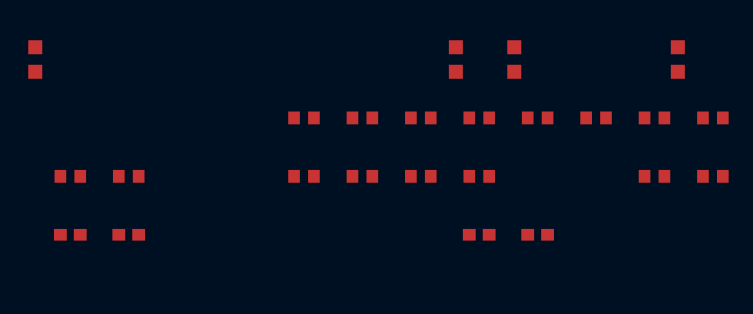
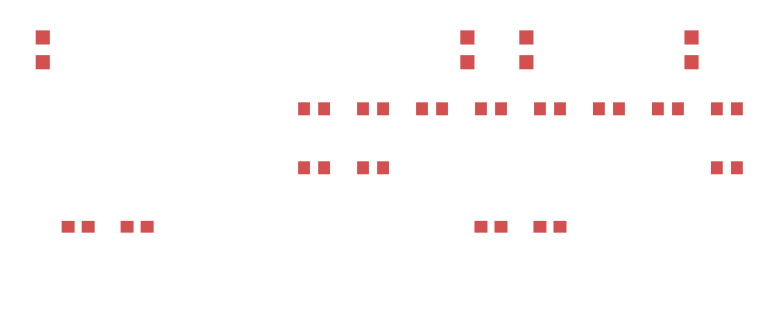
part: (70, 176) -> none
part: (128, 176) -> none
part: (420, 176) -> none
part: (479, 176) -> none
part: (654, 176) -> none

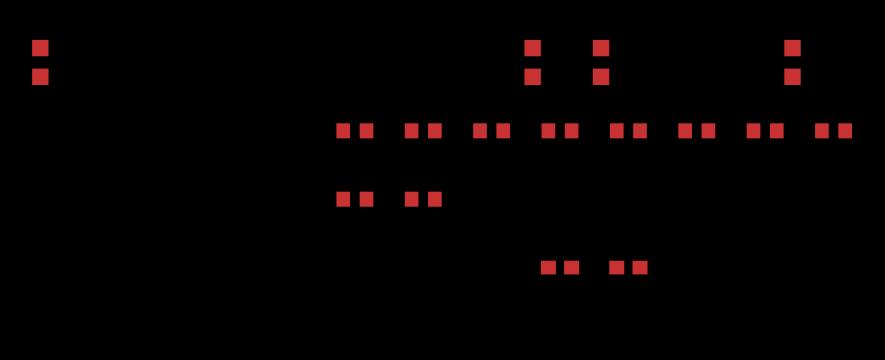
part: (726, 167) -> none
part: (78, 226) -> none
part: (137, 226) -> none

